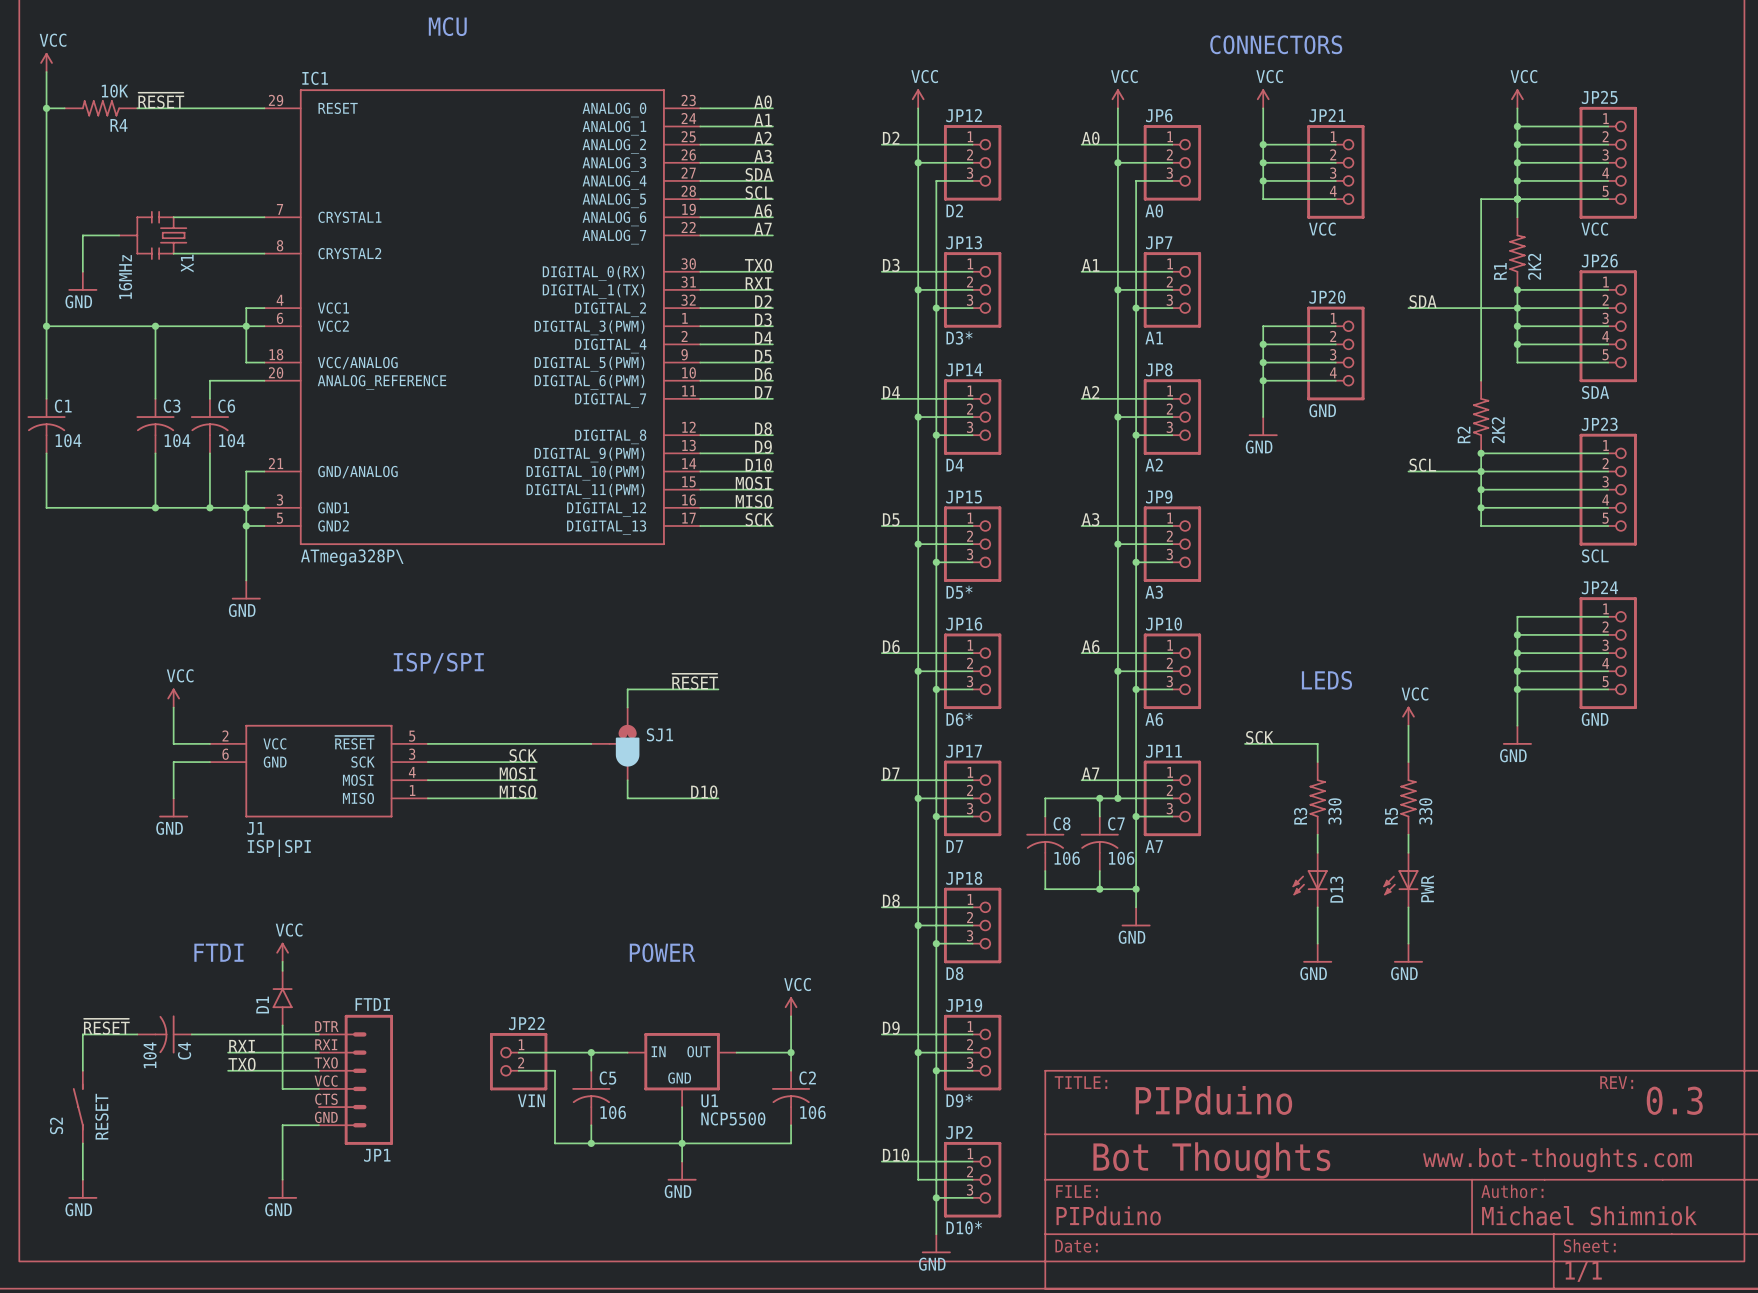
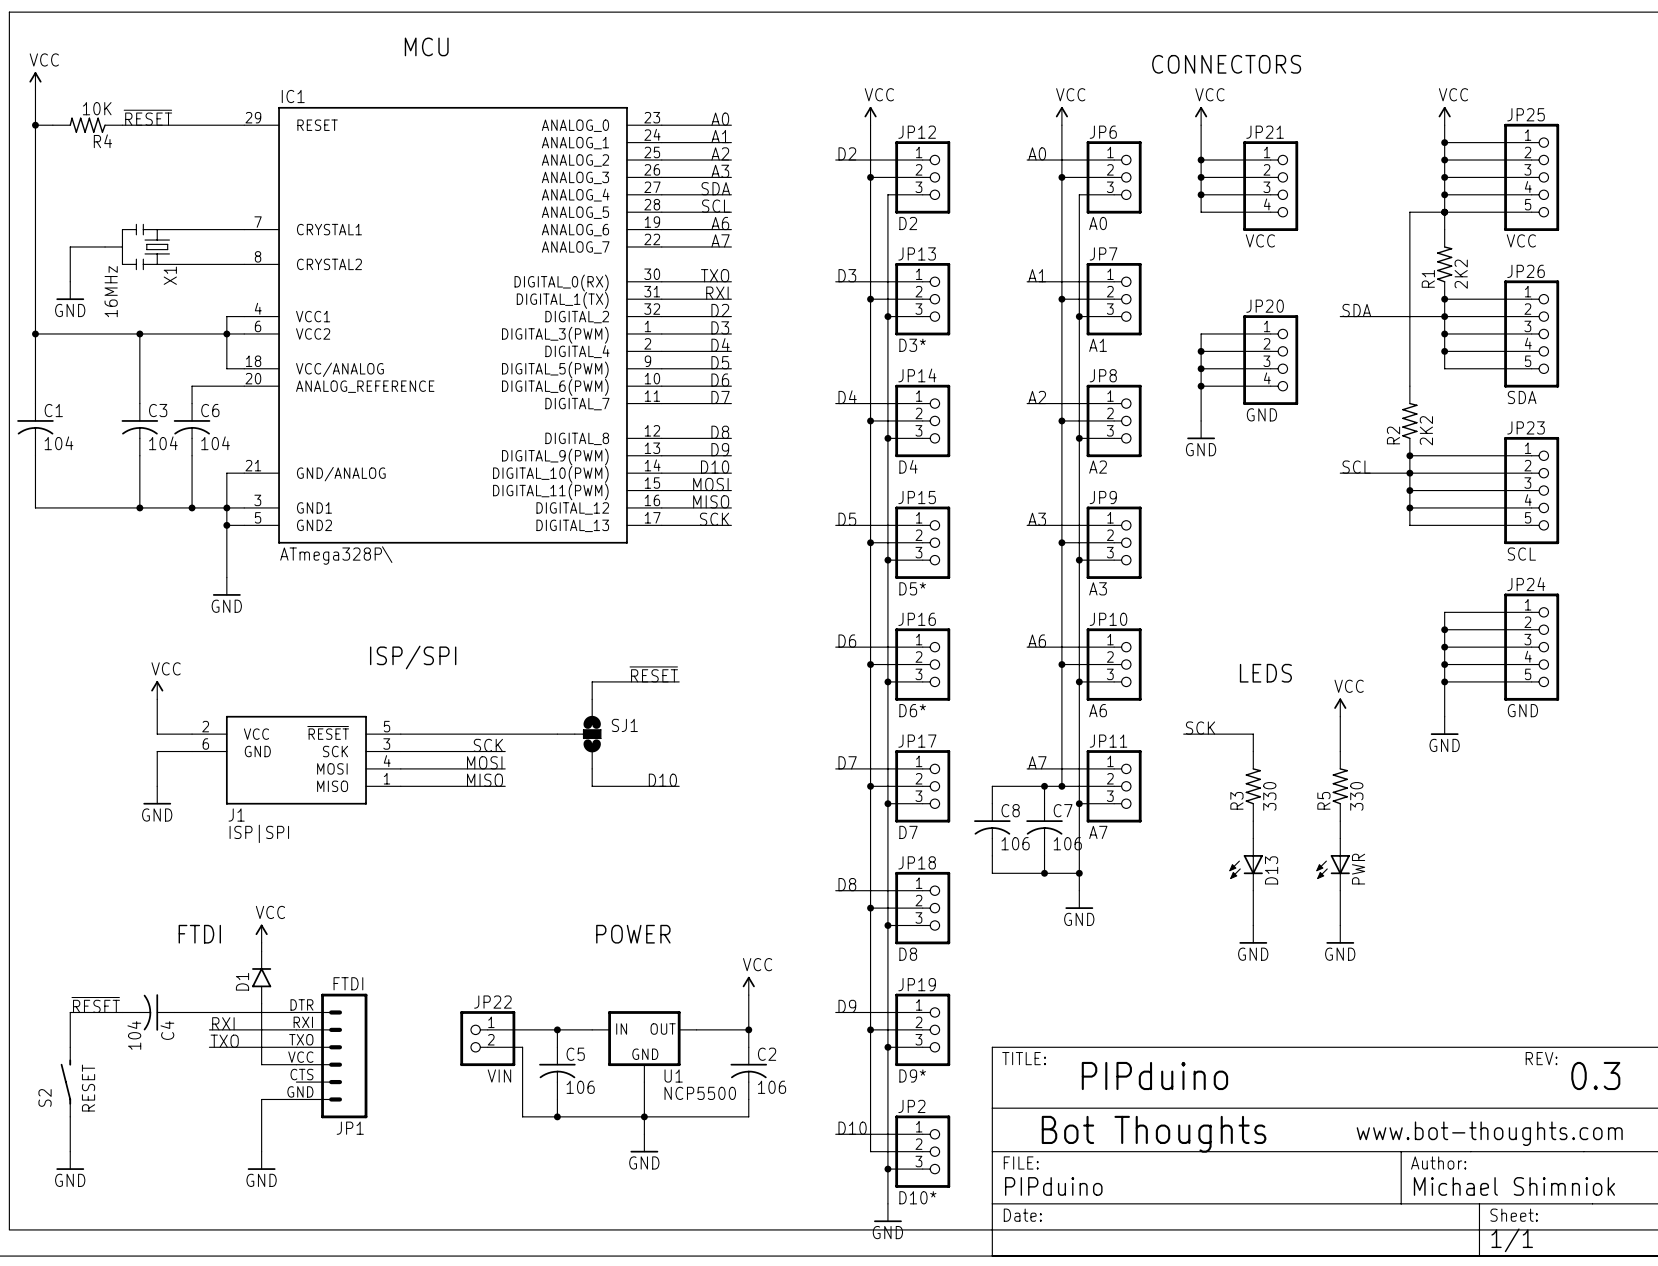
SJ1 symbol: [591, 707, 640, 781] -> [557, 699, 602, 769]

